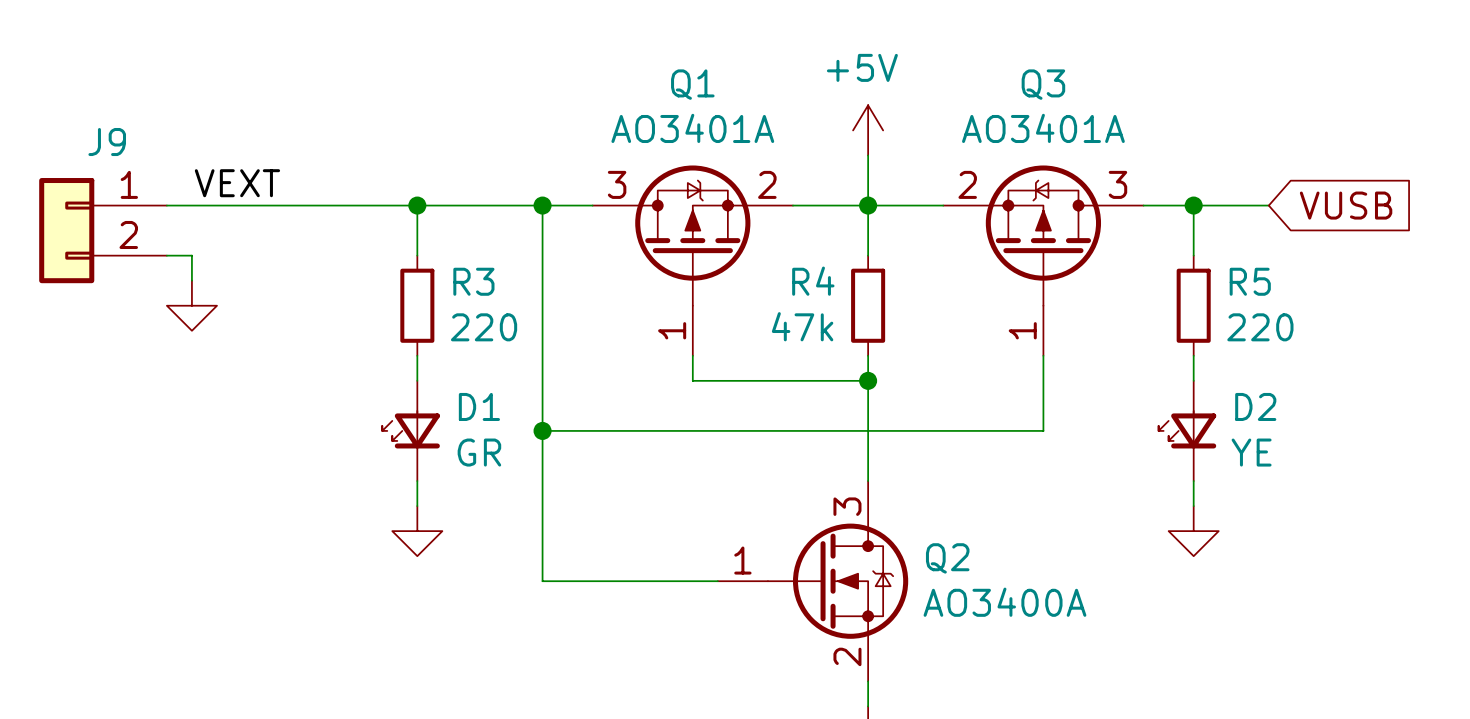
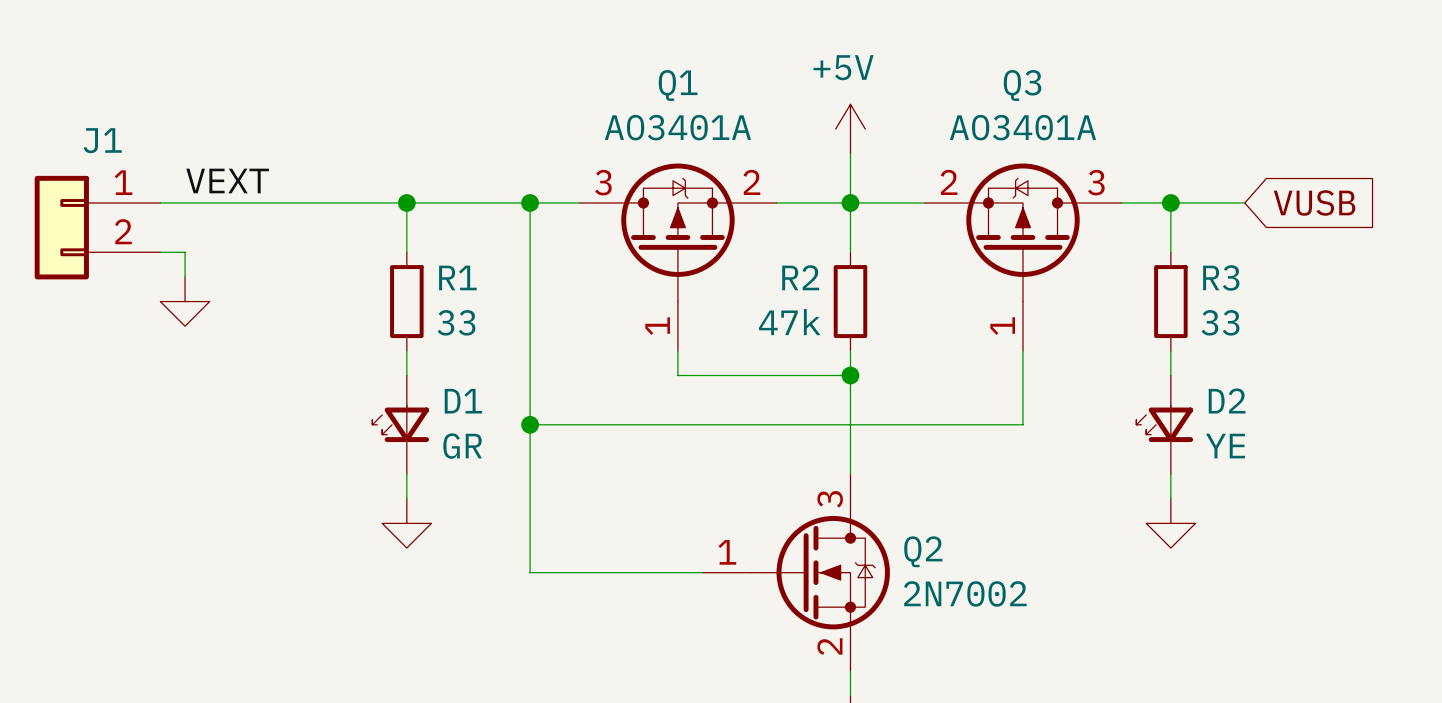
J9 name: J9 (107, 142) -> J1 (102, 140)
R3 name: R3 (473, 281) -> R1 (457, 277)
R4 name: R4 (813, 281) -> R2 (800, 277)
R5 name: R5 (1250, 281) -> R3 (1221, 277)
R3 value: 220 (484, 327) -> 33 (456, 322)
R5 value: 220 (1260, 327) -> 33 (1220, 322)
Q2 value: AO3400A (1004, 602) -> 2N7002 (965, 593)

